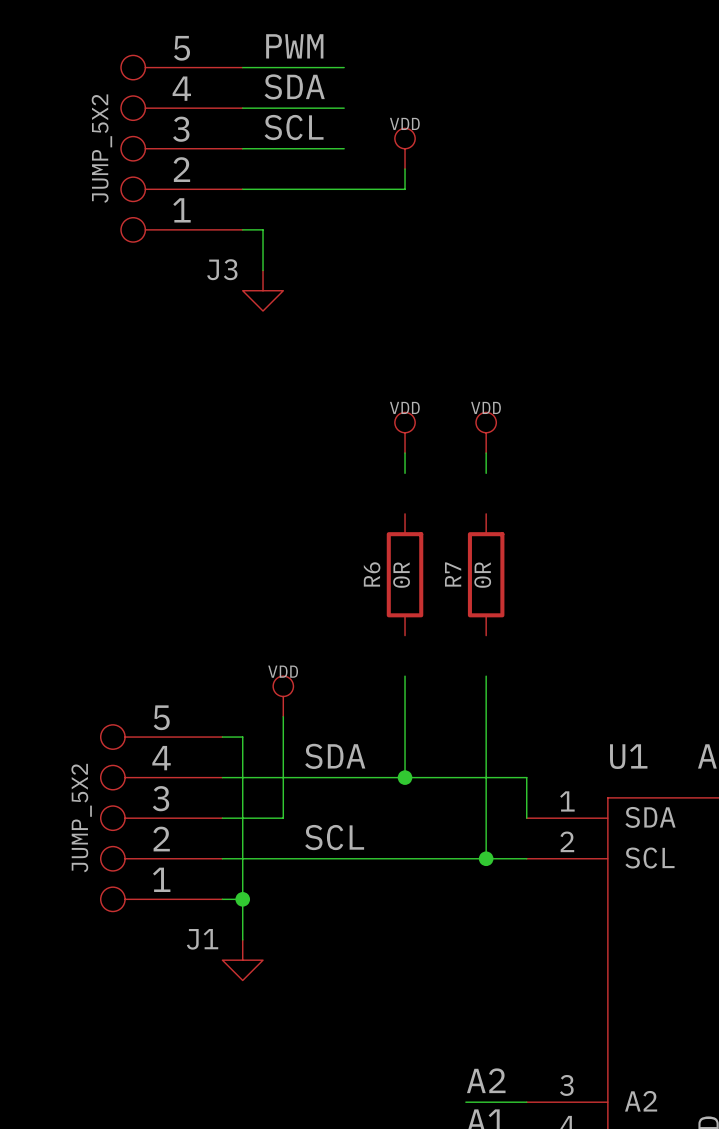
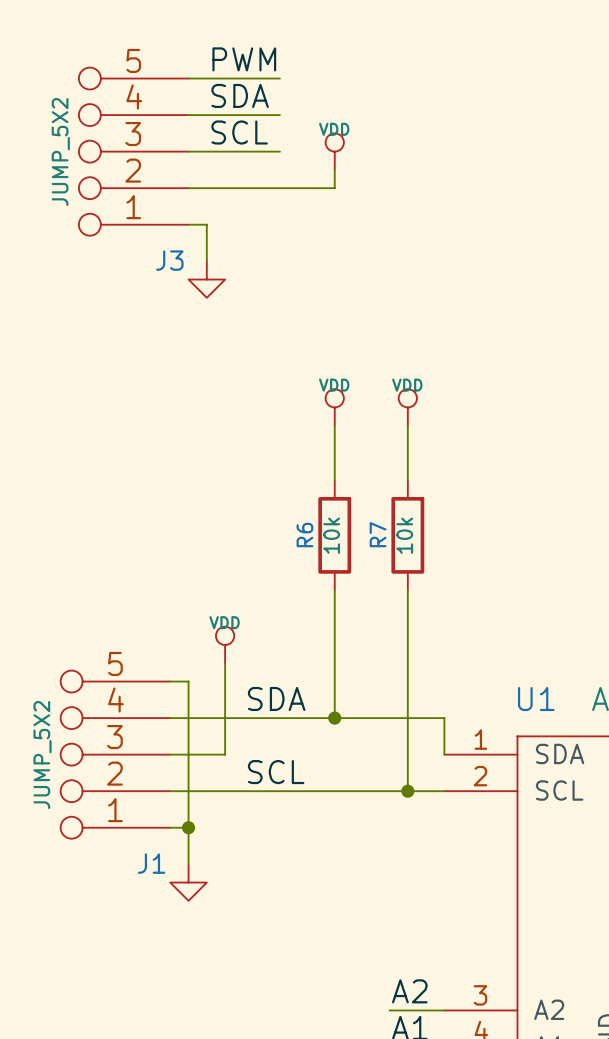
wire: none -> (334, 444) (334, 480)
wire: none -> (407, 444) (407, 480)
R6 value: 0R (401, 575) -> 10k (331, 535)
R7 value: 0R (482, 575) -> 10k (404, 535)
wire: none -> (334, 590) (334, 626)
wire: none -> (407, 590) (407, 626)

